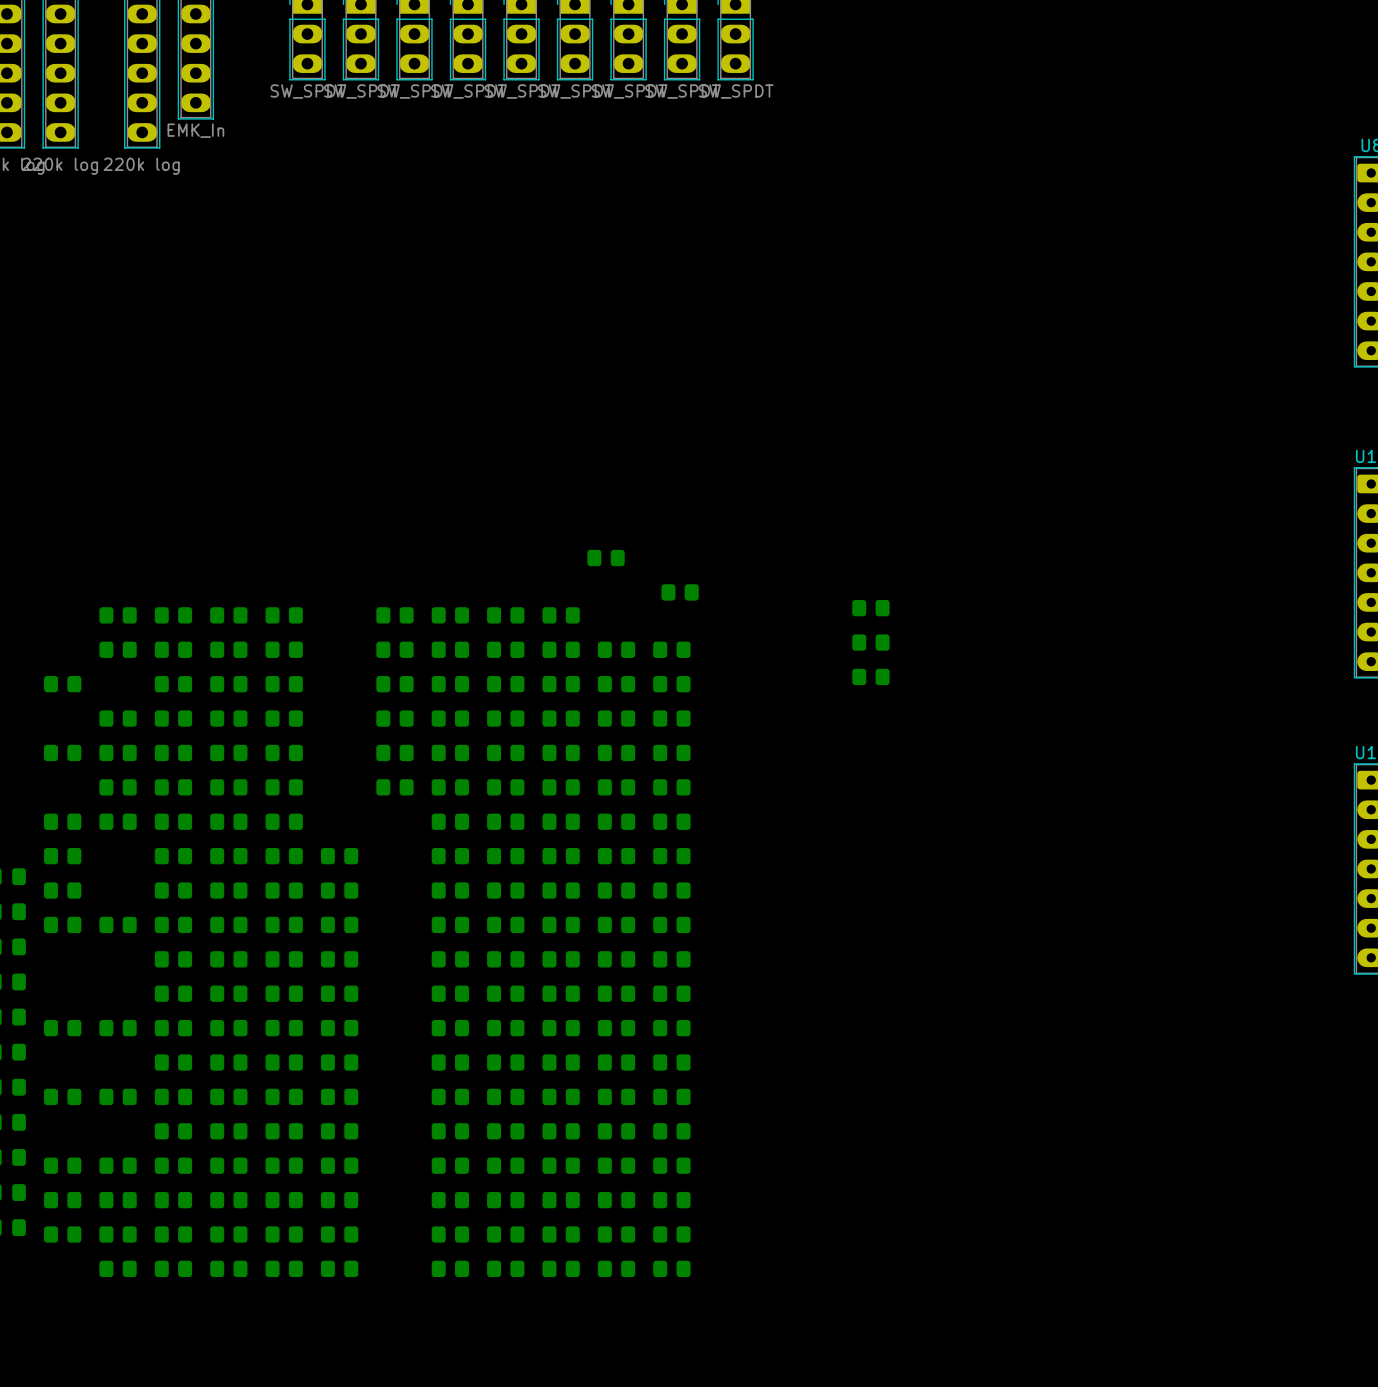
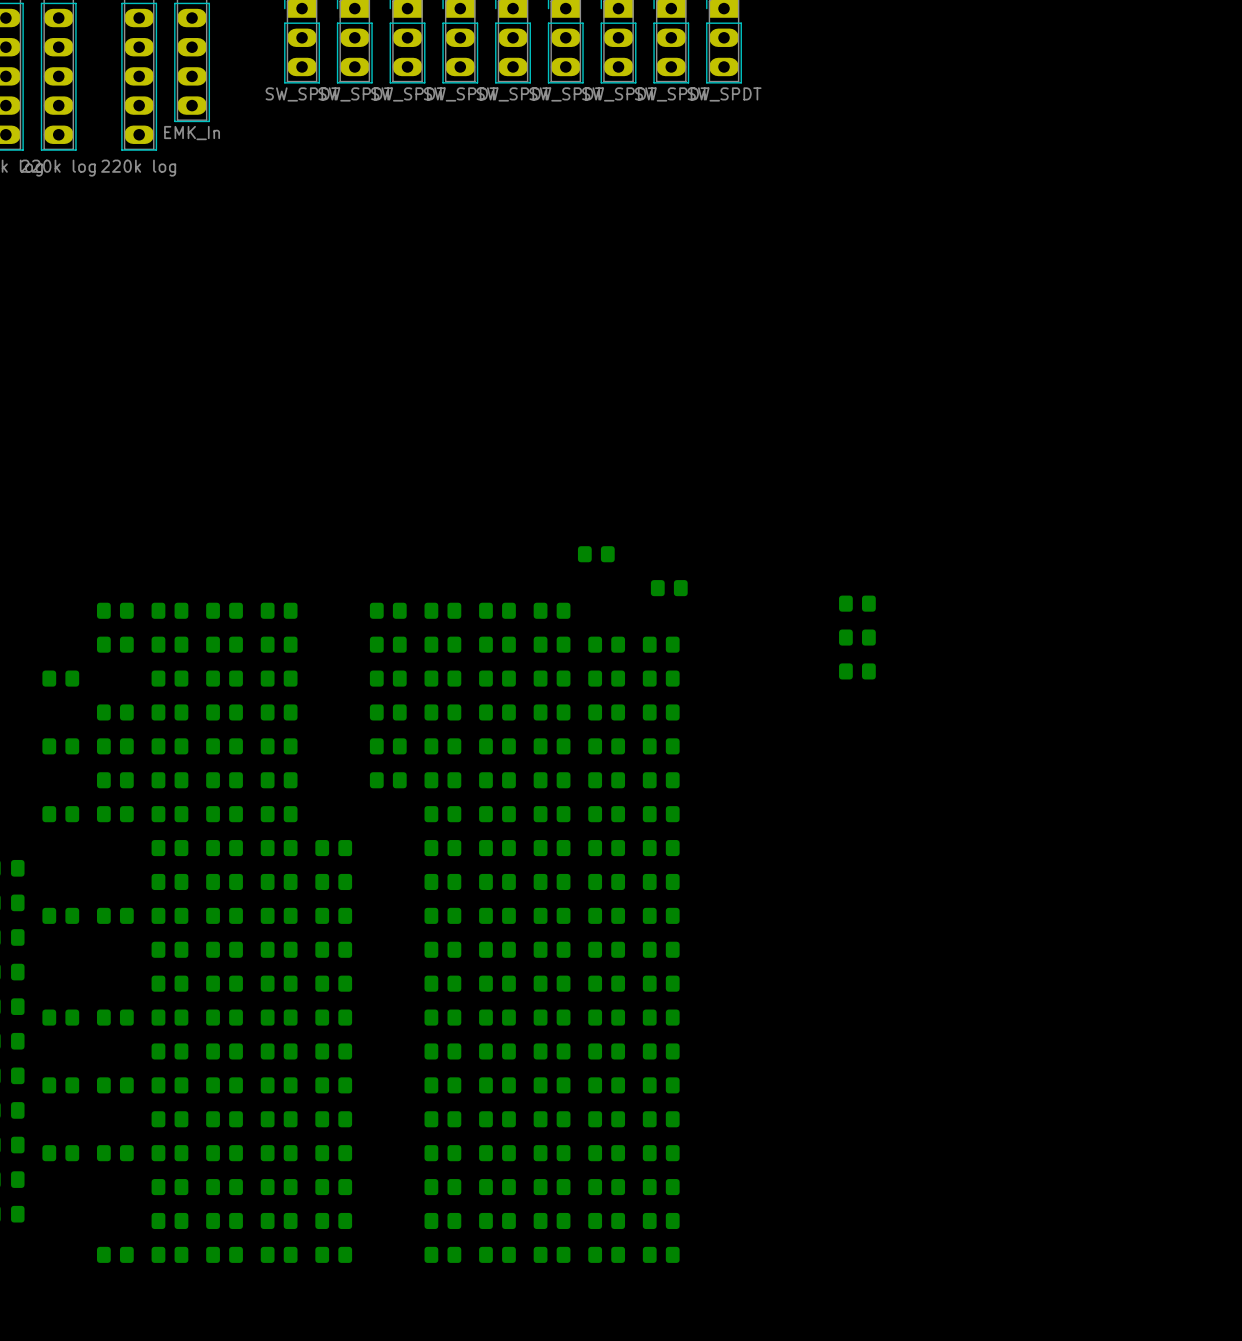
part: (62, 856) -> none
part: (62, 890) -> none
part: (62, 1200) -> none
part: (118, 1200) -> none
part: (62, 1234) -> none
part: (118, 1234) -> none

